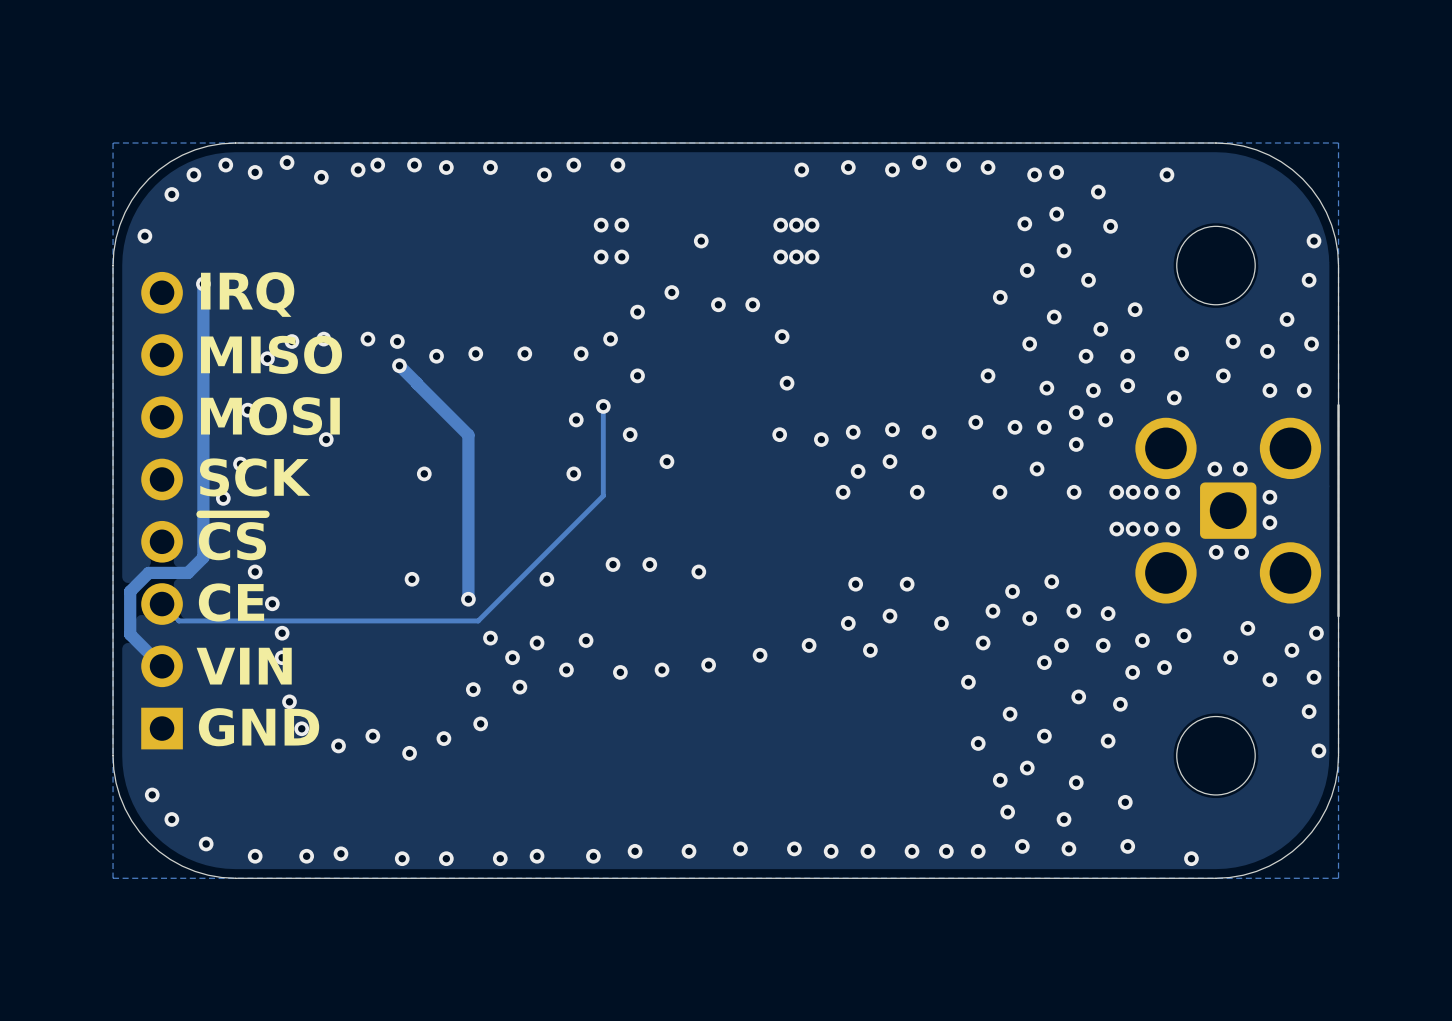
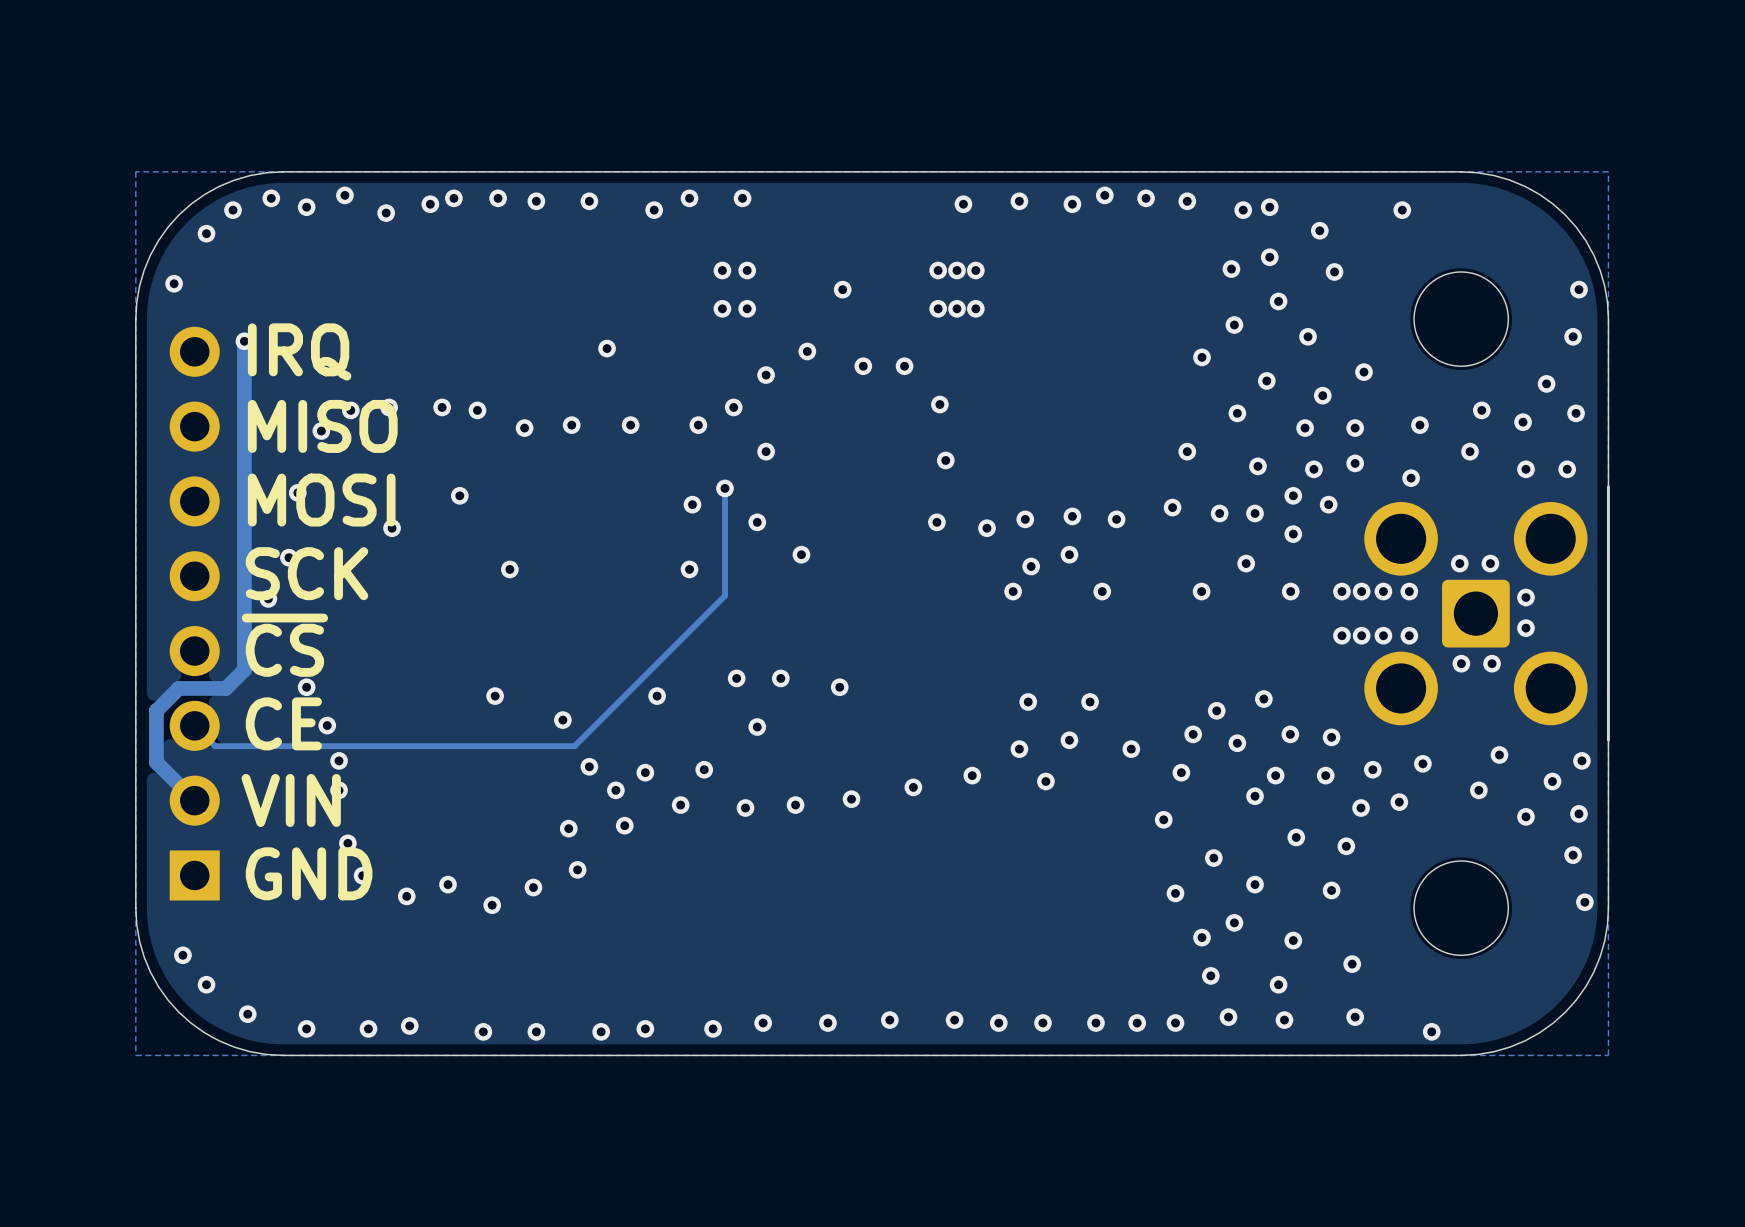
via: none -> (607, 348)
track: (399, 365) (416, 383) -> none
via position: (399, 365) -> (459, 495)
track: (416, 383) (468, 435) (468, 599) -> none
via: none -> (757, 727)

